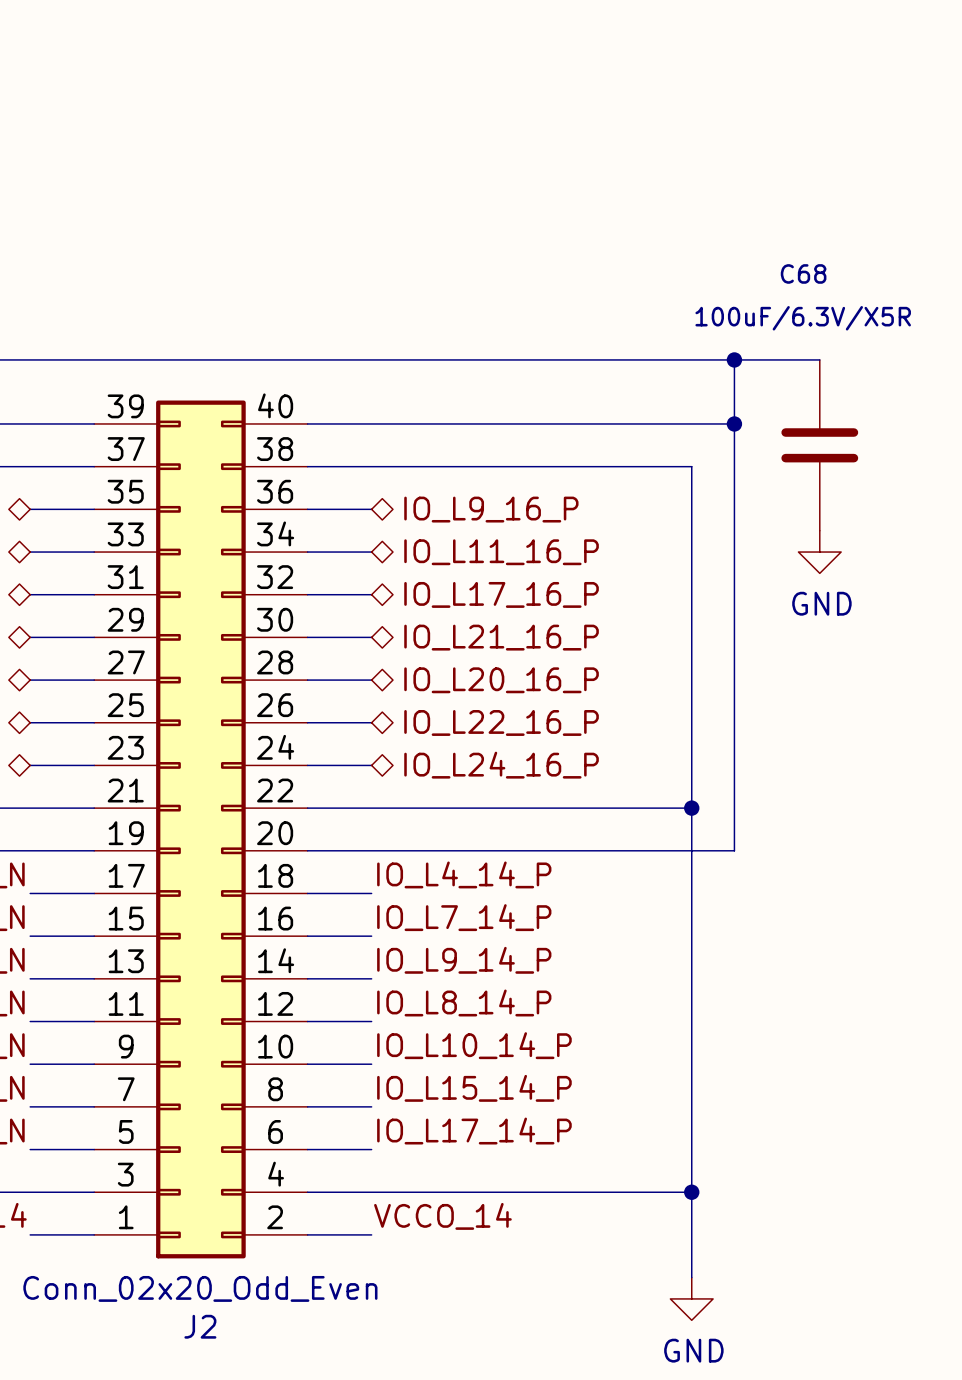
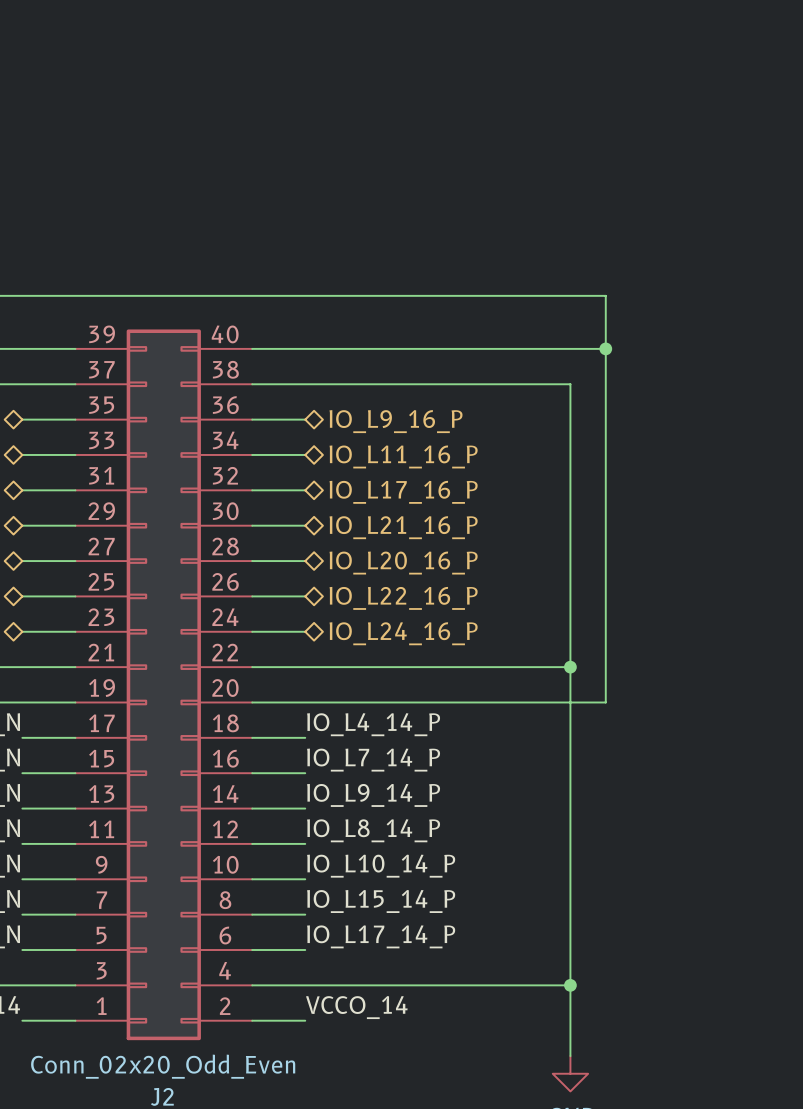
wire: (734, 359) (819, 359) -> none
junction: (734, 359) -> none
C68: 100uF/6.3V/X5R (819, 445) -> none
power symbol: GND (819, 552) -> none

